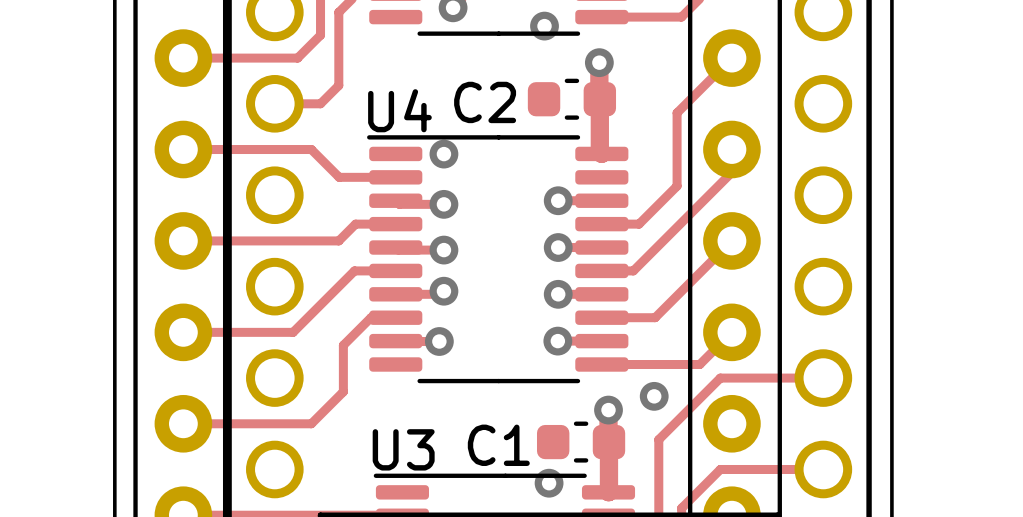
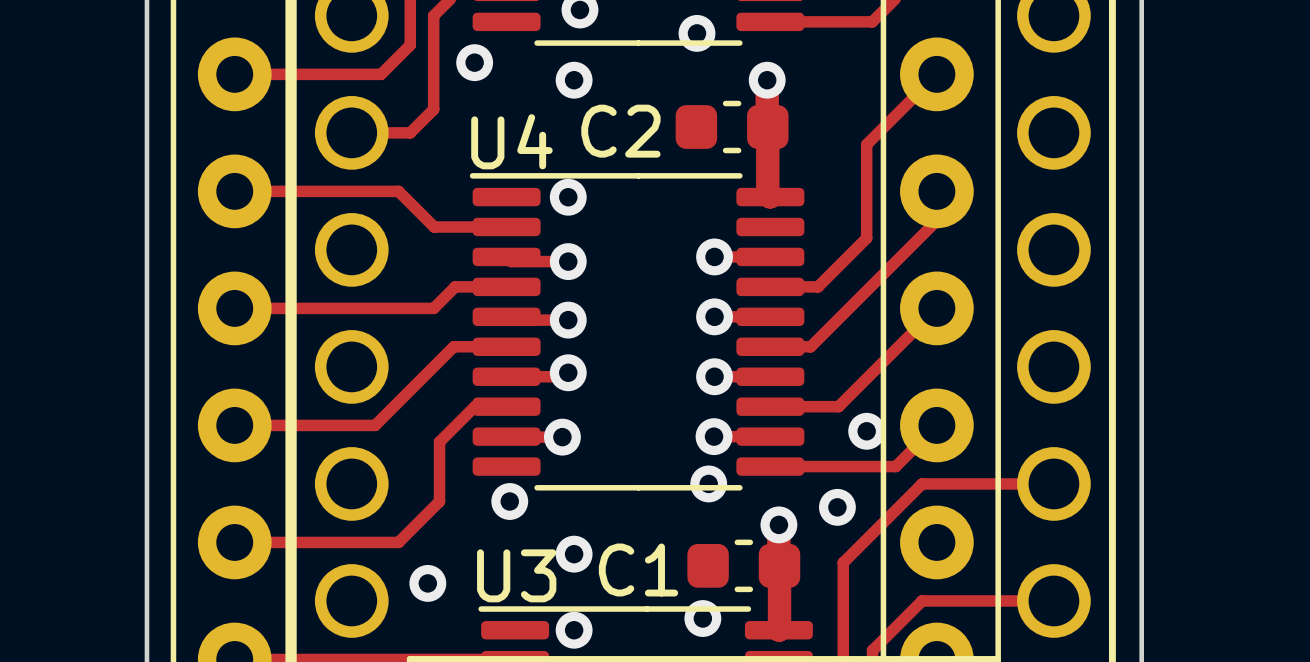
via: none -> (474, 62)
via: none -> (574, 80)
via: none -> (866, 431)
via: none -> (708, 483)
via: none -> (509, 501)
via: none -> (574, 554)
via: none -> (427, 583)
via: none -> (574, 630)

